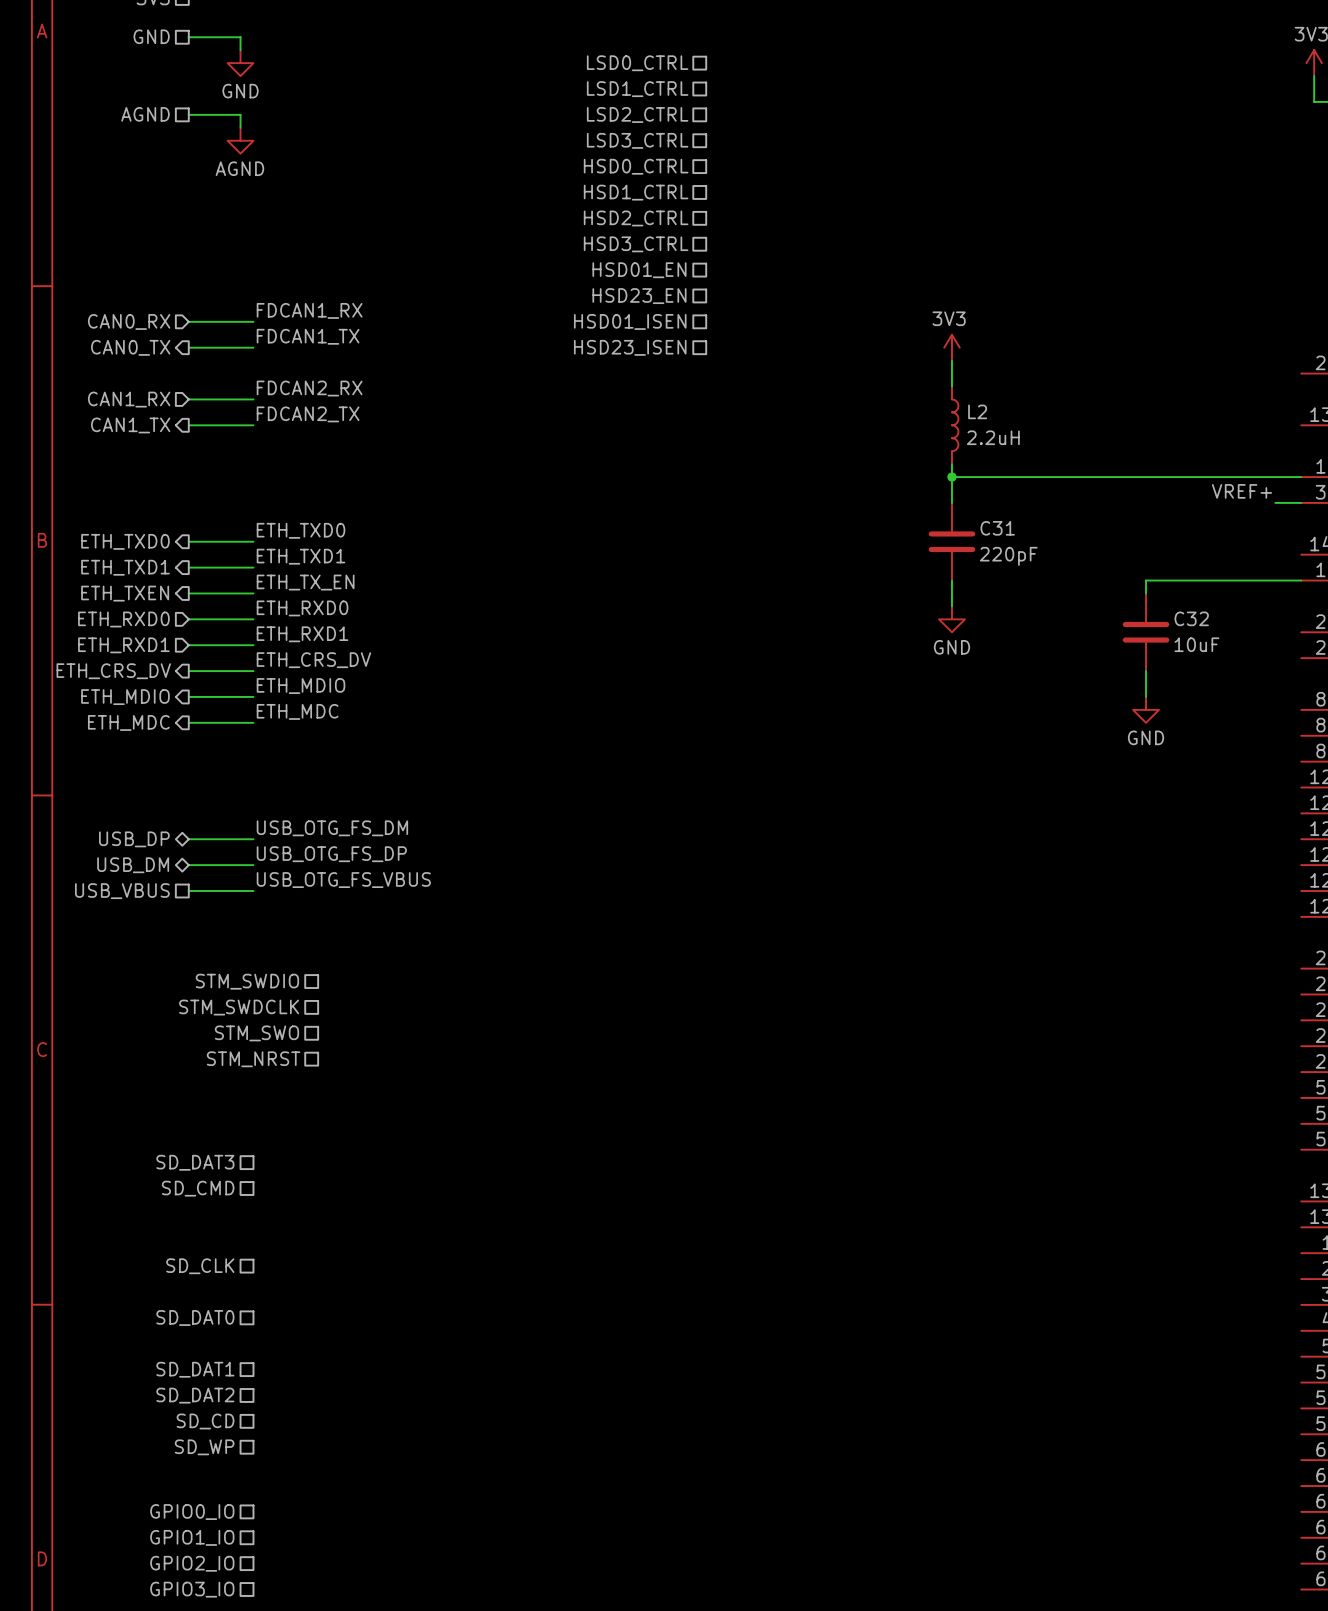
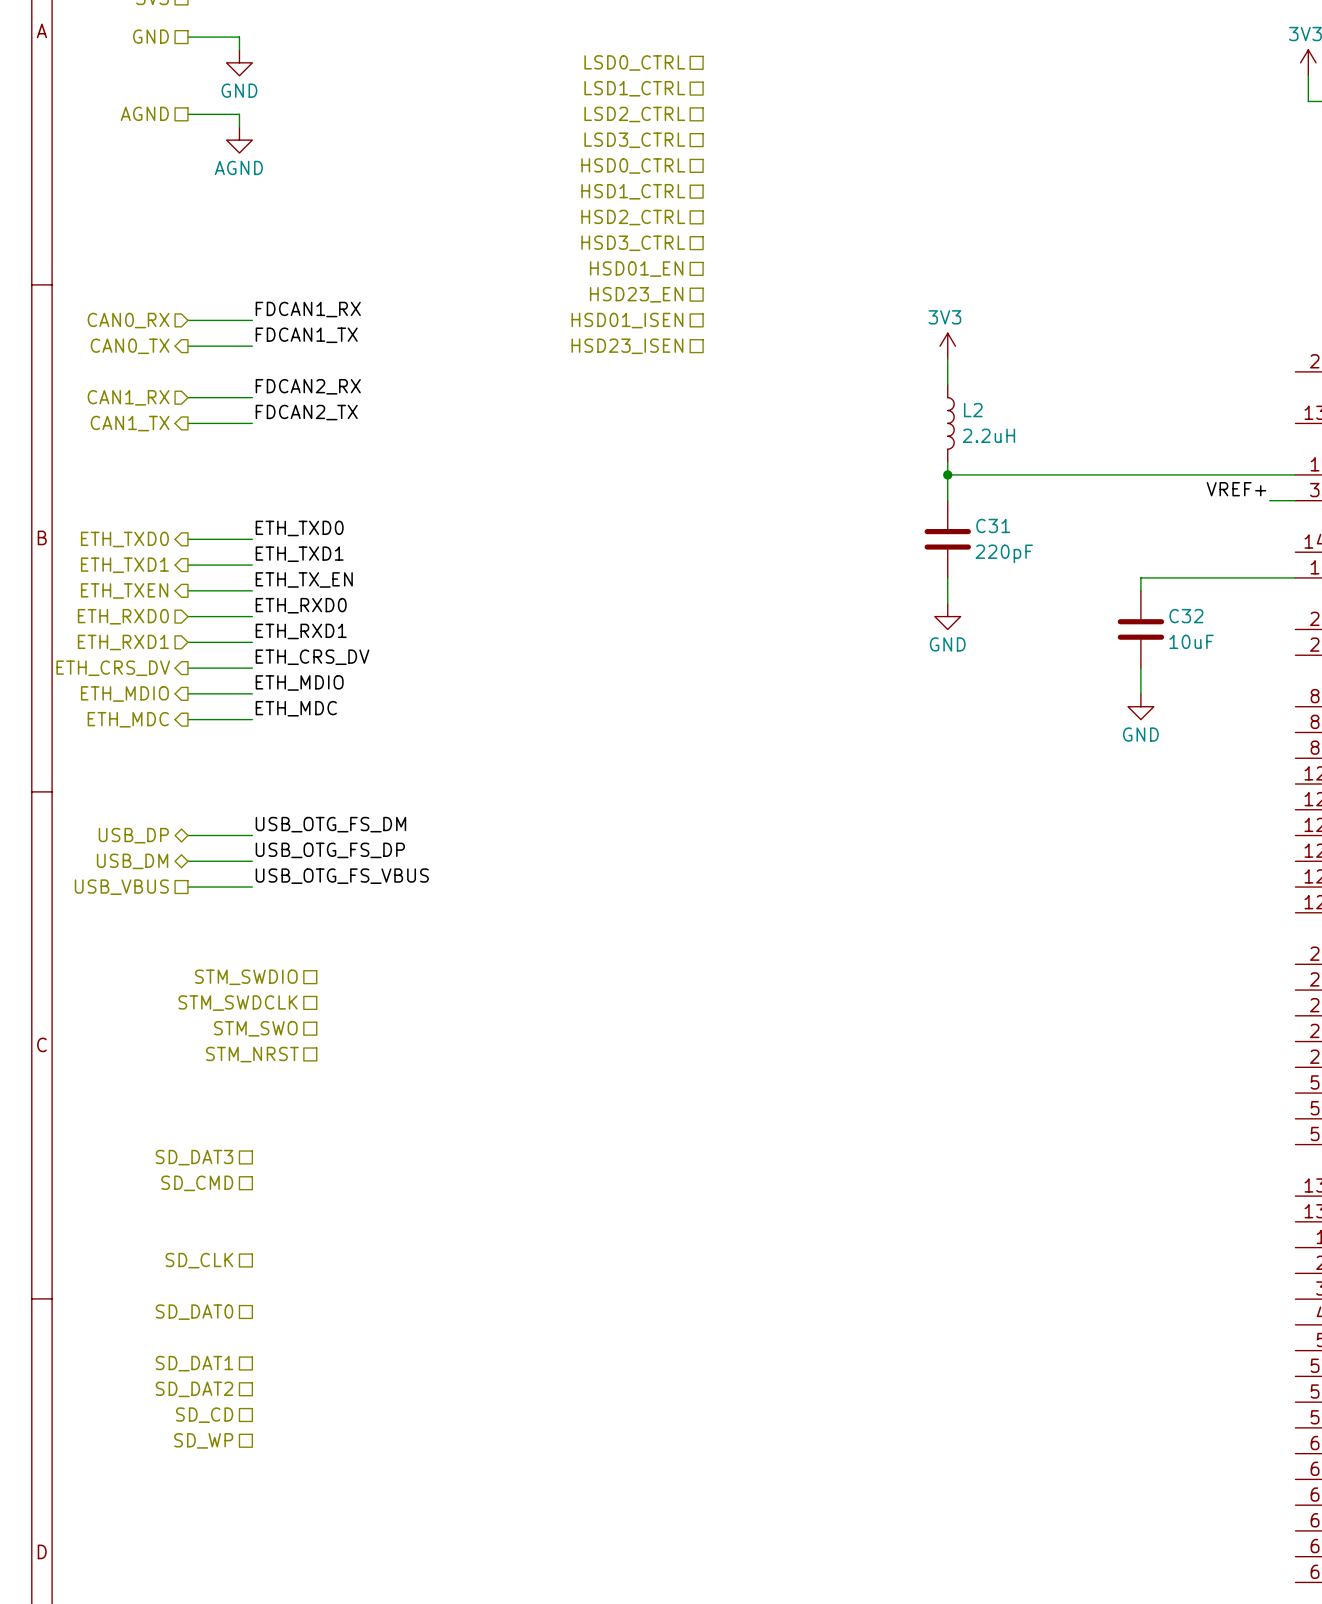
hierarchical label: GPIO0_IO (192, 1512) -> none
hierarchical label: GPIO1_IO (192, 1537) -> none
hierarchical label: GPIO2_IO (192, 1563) -> none
hierarchical label: GPIO3_IO (192, 1589) -> none

